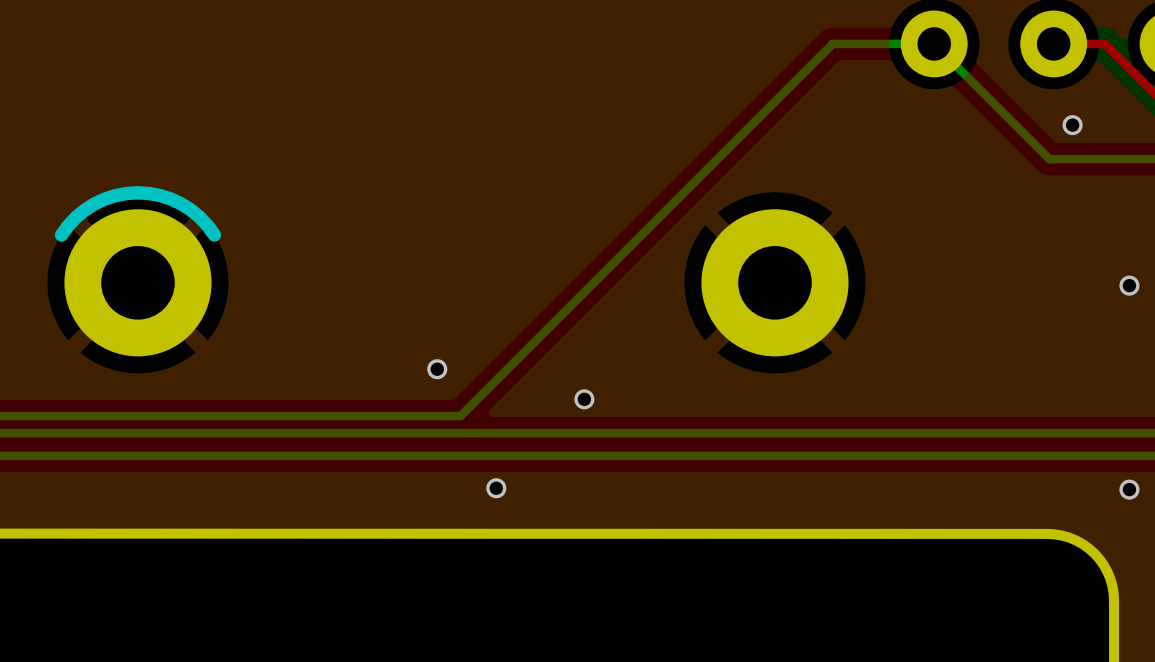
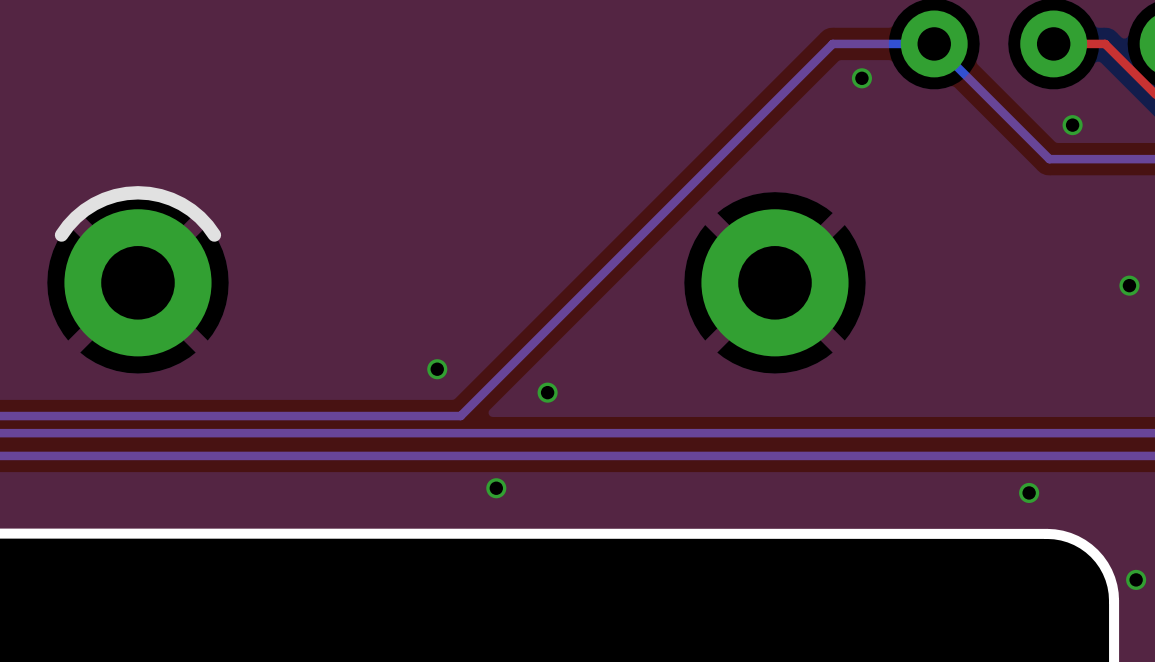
via: none -> (861, 78)
via position: (584, 399) -> (547, 392)
via: (1129, 489) -> none
via: none -> (1029, 492)
via: none -> (1136, 579)

